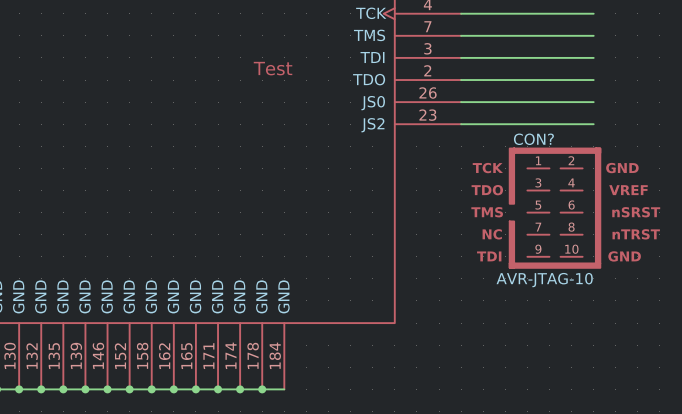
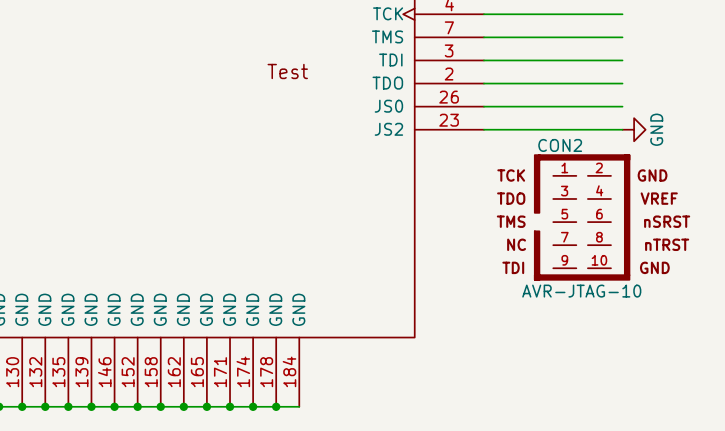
power symbol: none -> GND (634, 129)
CON? name: CON? (533, 139) -> CON2 (560, 145)

